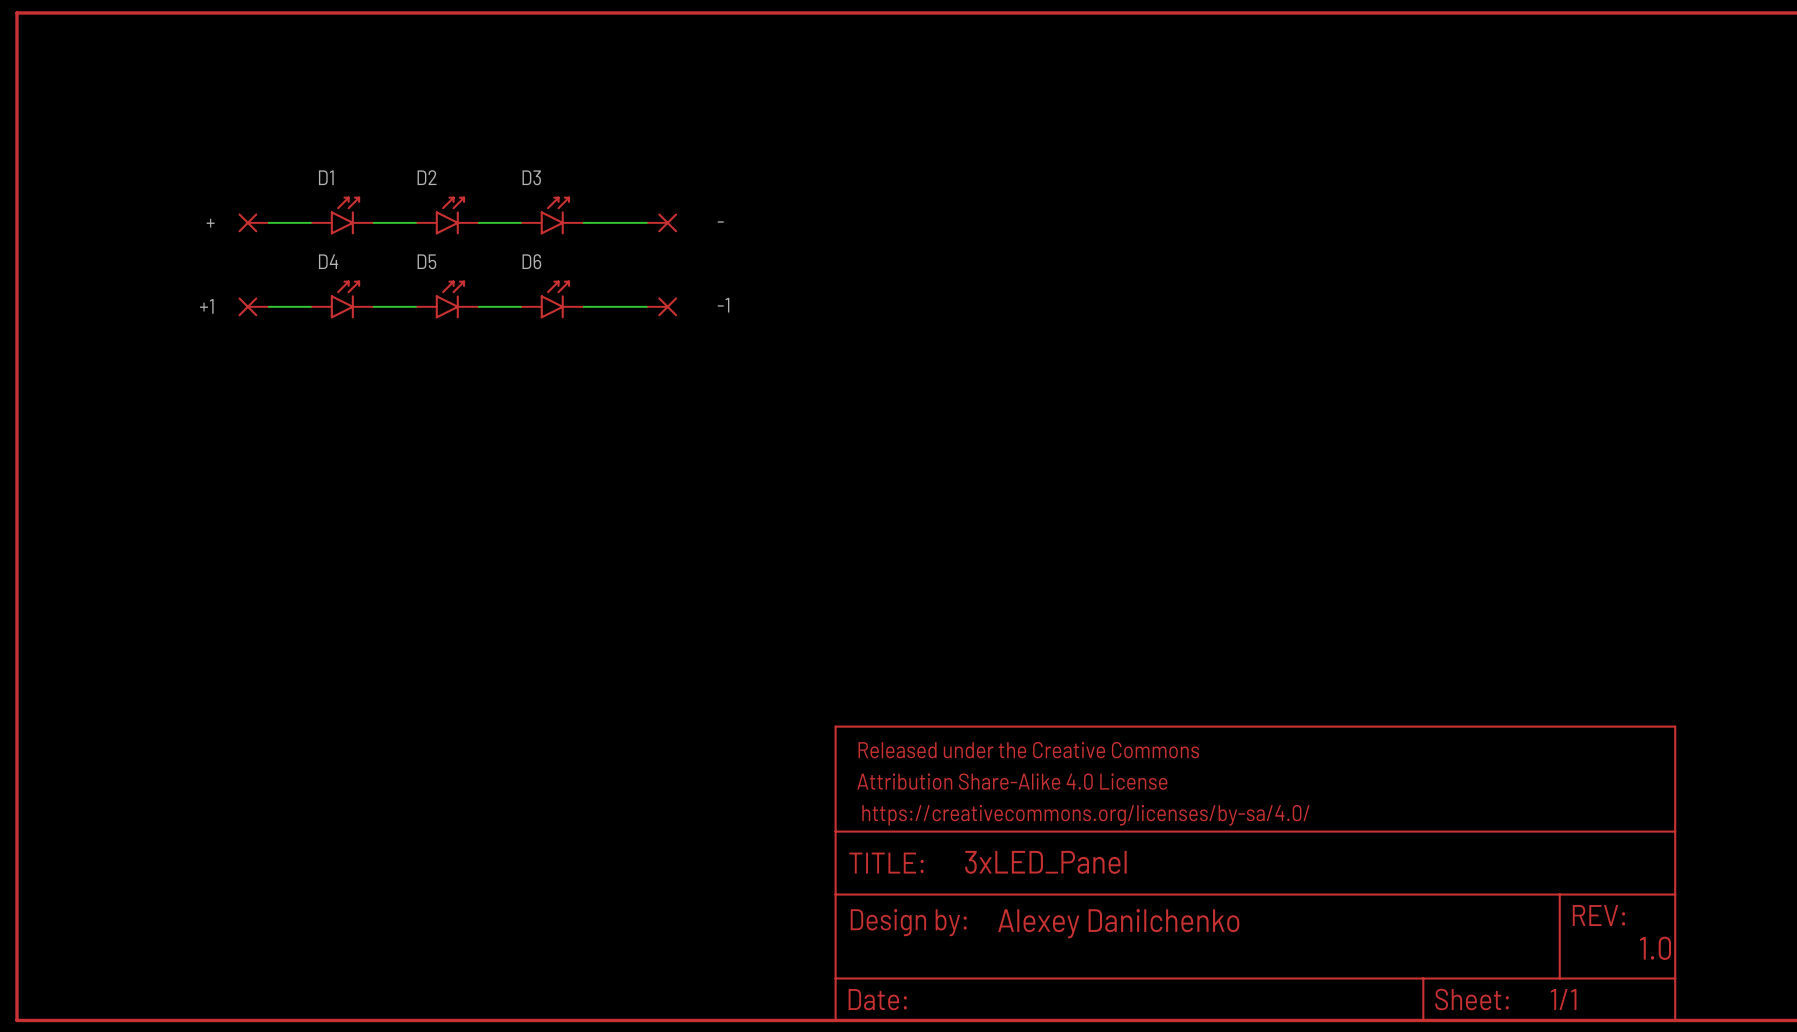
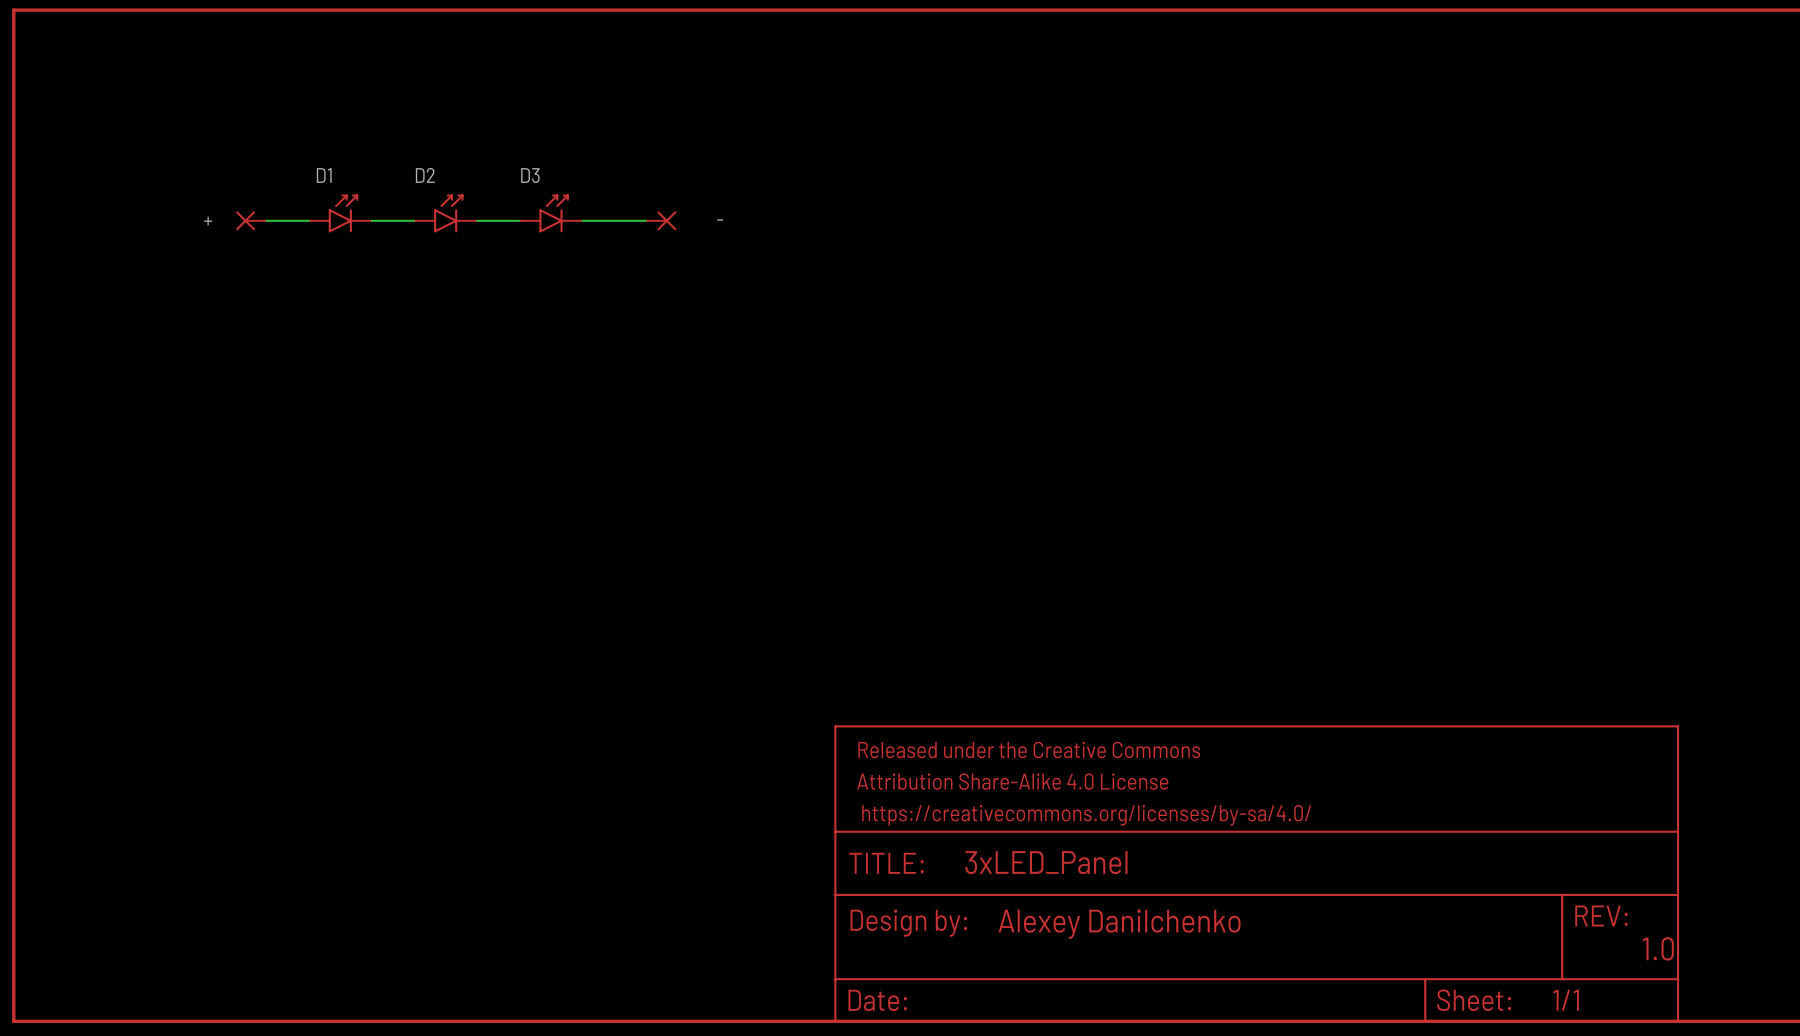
D4: (342, 299) -> none
D5: (447, 299) -> none
D6: (552, 299) -> none
+1: (253, 306) -> none
wire: (268, 306) (310, 306) -> none
wire: (373, 306) (415, 306) -> none
wire: (478, 306) (520, 306) -> none
wire: (583, 306) (646, 306) -> none
-1: (661, 306) -> none

